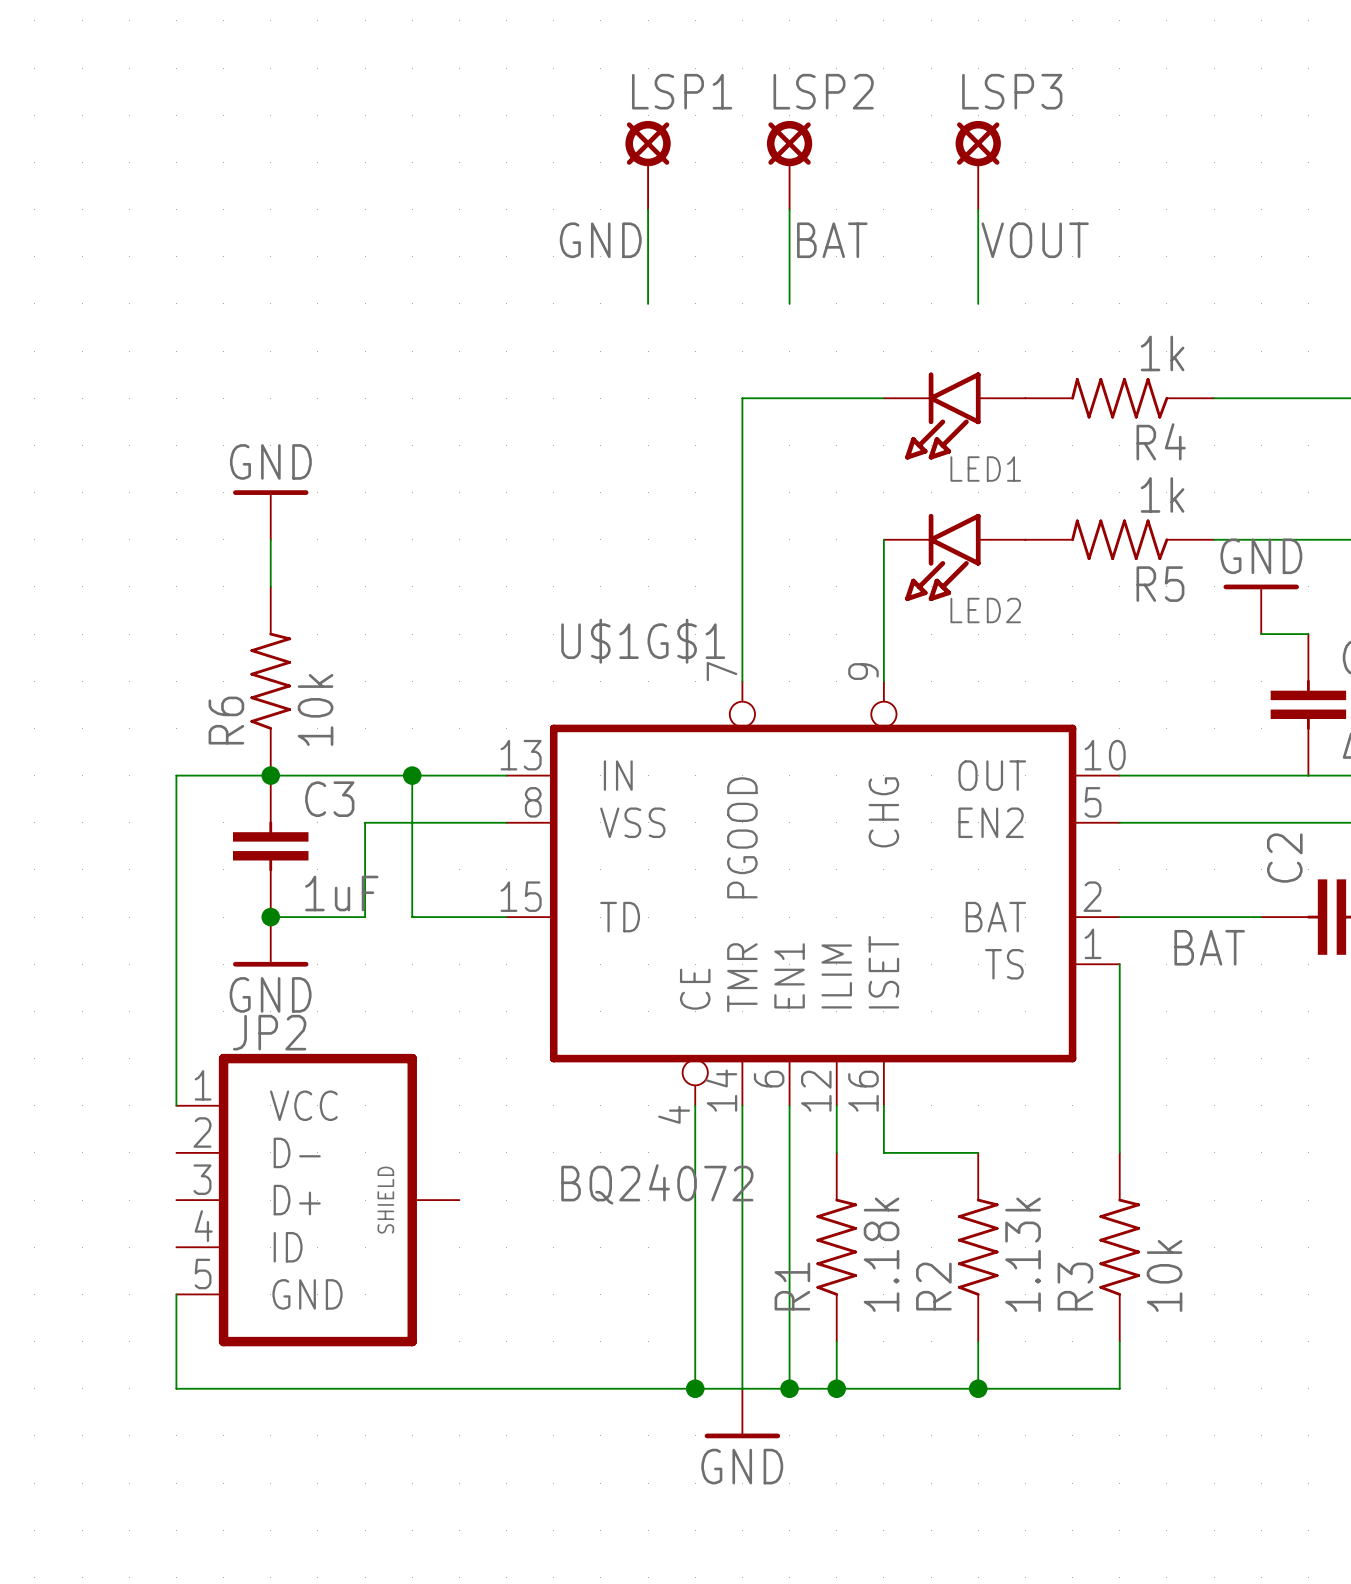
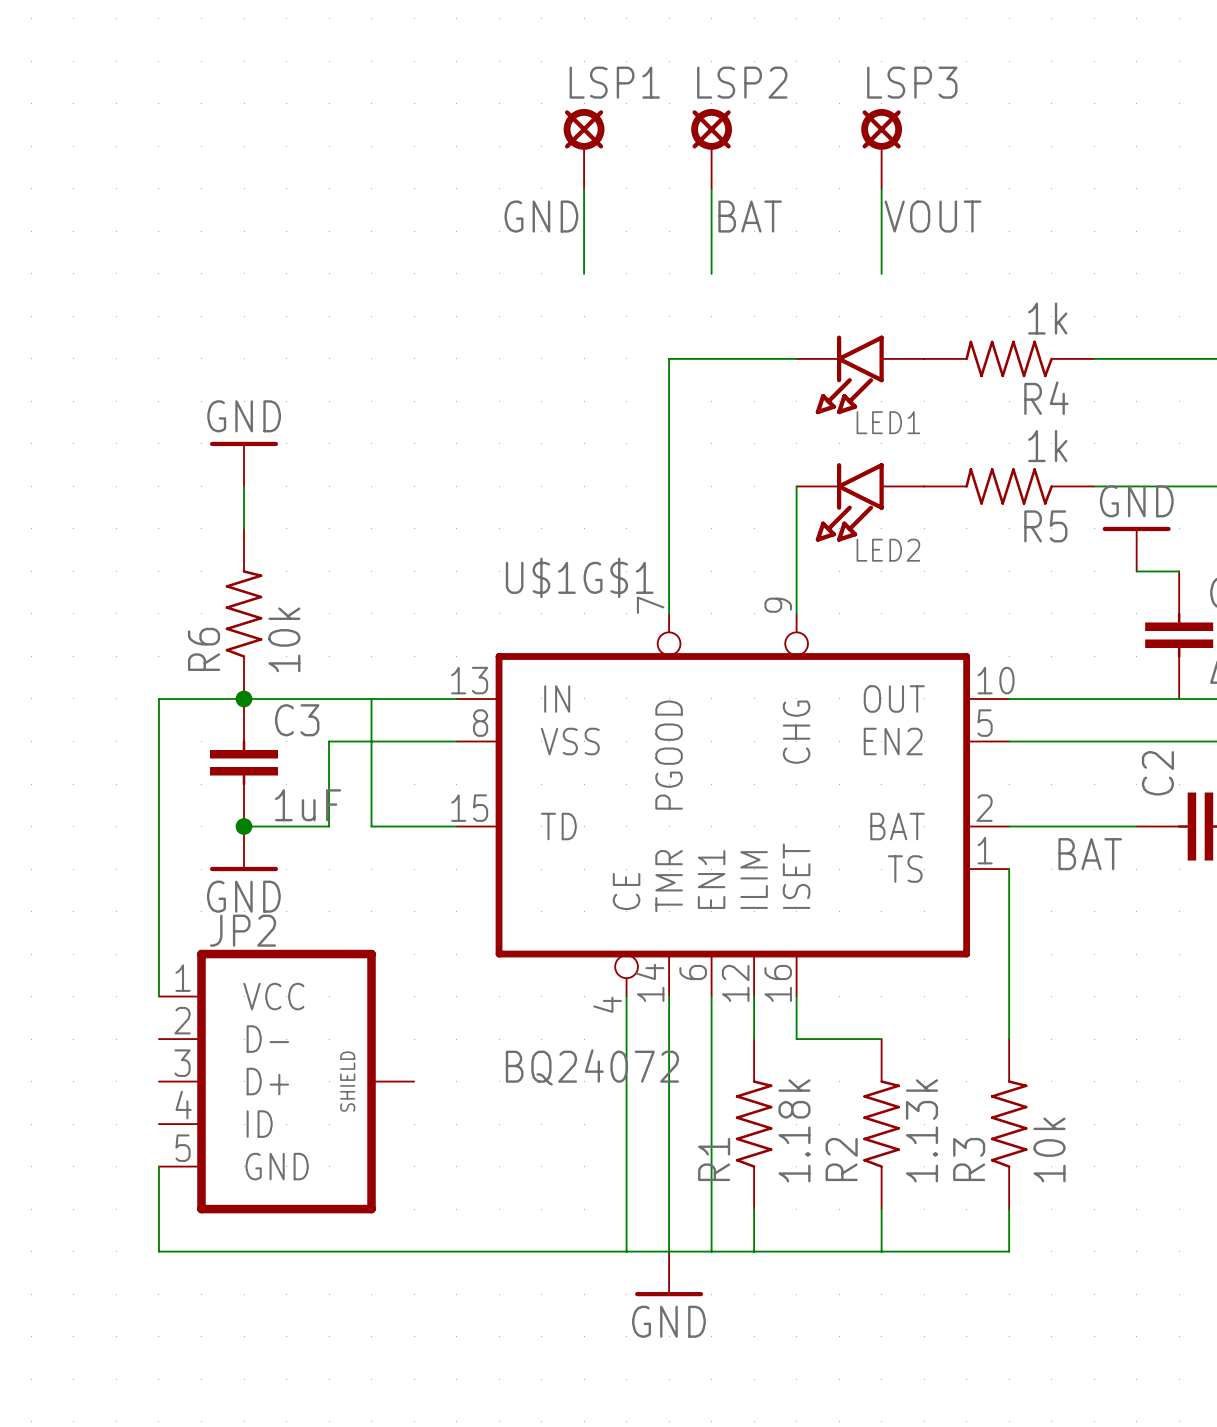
junction: (412, 775) -> none
junction: (695, 1388) -> none
junction: (789, 1388) -> none
junction: (836, 1388) -> none
junction: (978, 1388) -> none

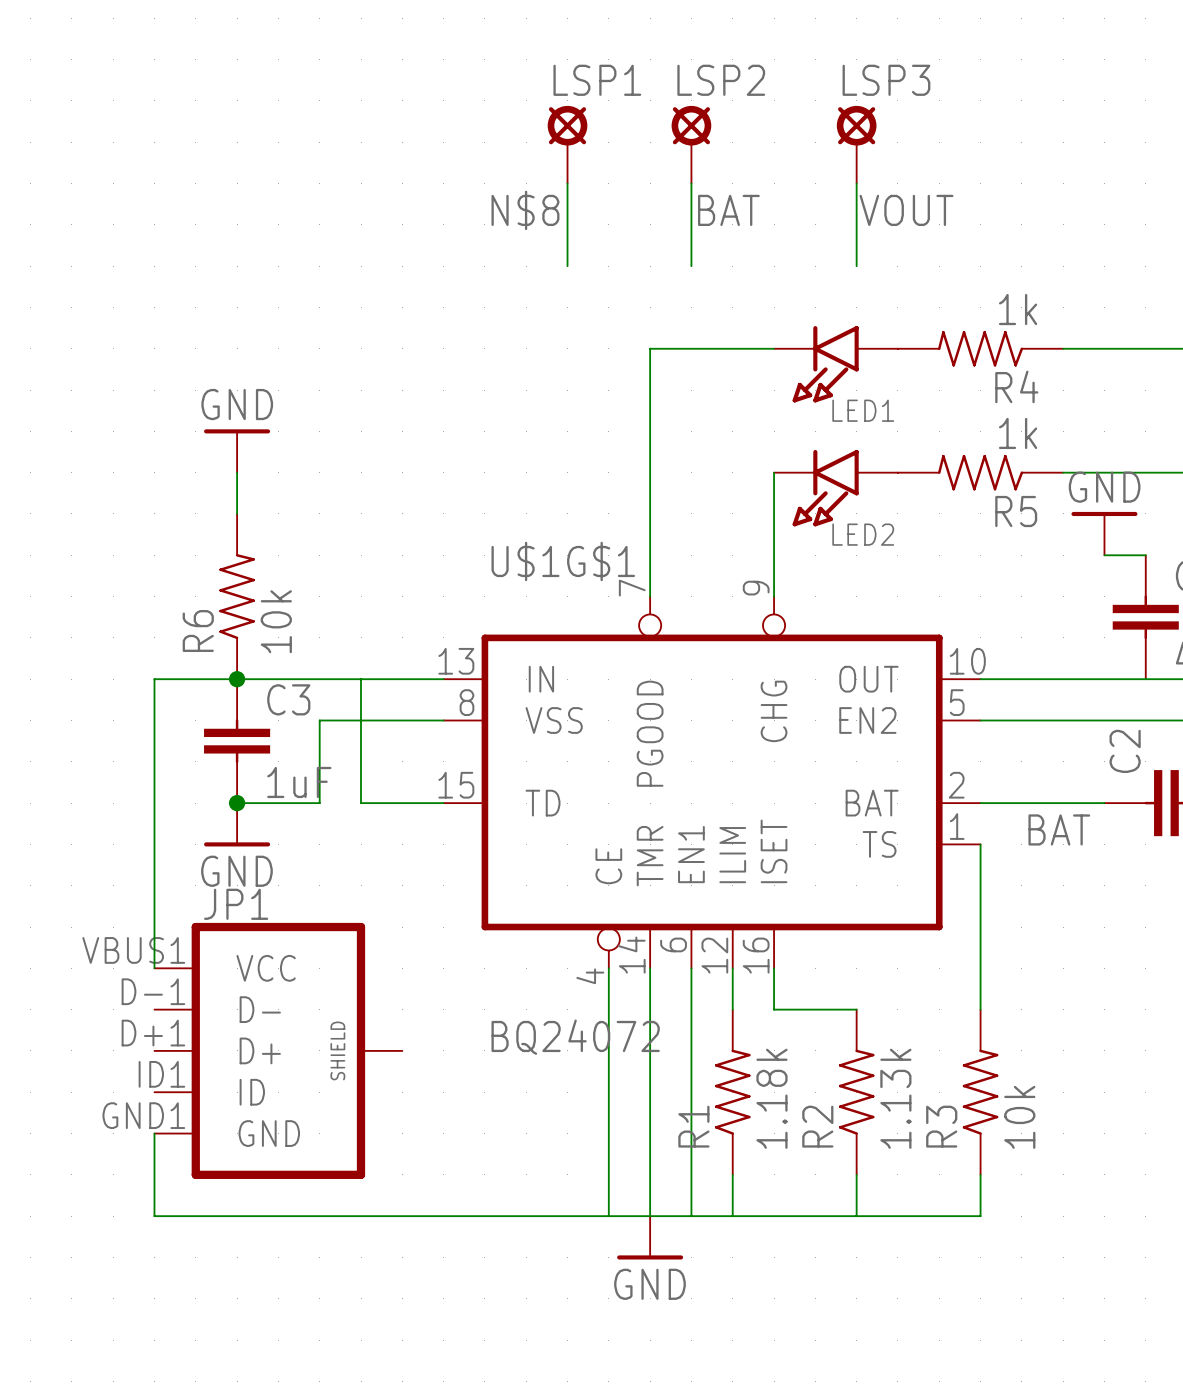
label: GND (541, 216) -> N$8 (525, 210)
JP2 name: JP2 (243, 930) -> JP1 (236, 904)
JP2 pin number: 1 (183, 978) -> VBUS1 (133, 950)
JP2 pin number: 2 (182, 1020) -> D-1 (153, 991)
JP2 pin number: 3 (182, 1063) -> D+1 (153, 1033)
JP2 pin number: 4 (183, 1105) -> ID1 (161, 1074)
JP2 pin number: 5 (183, 1148) -> GND1 (143, 1115)

